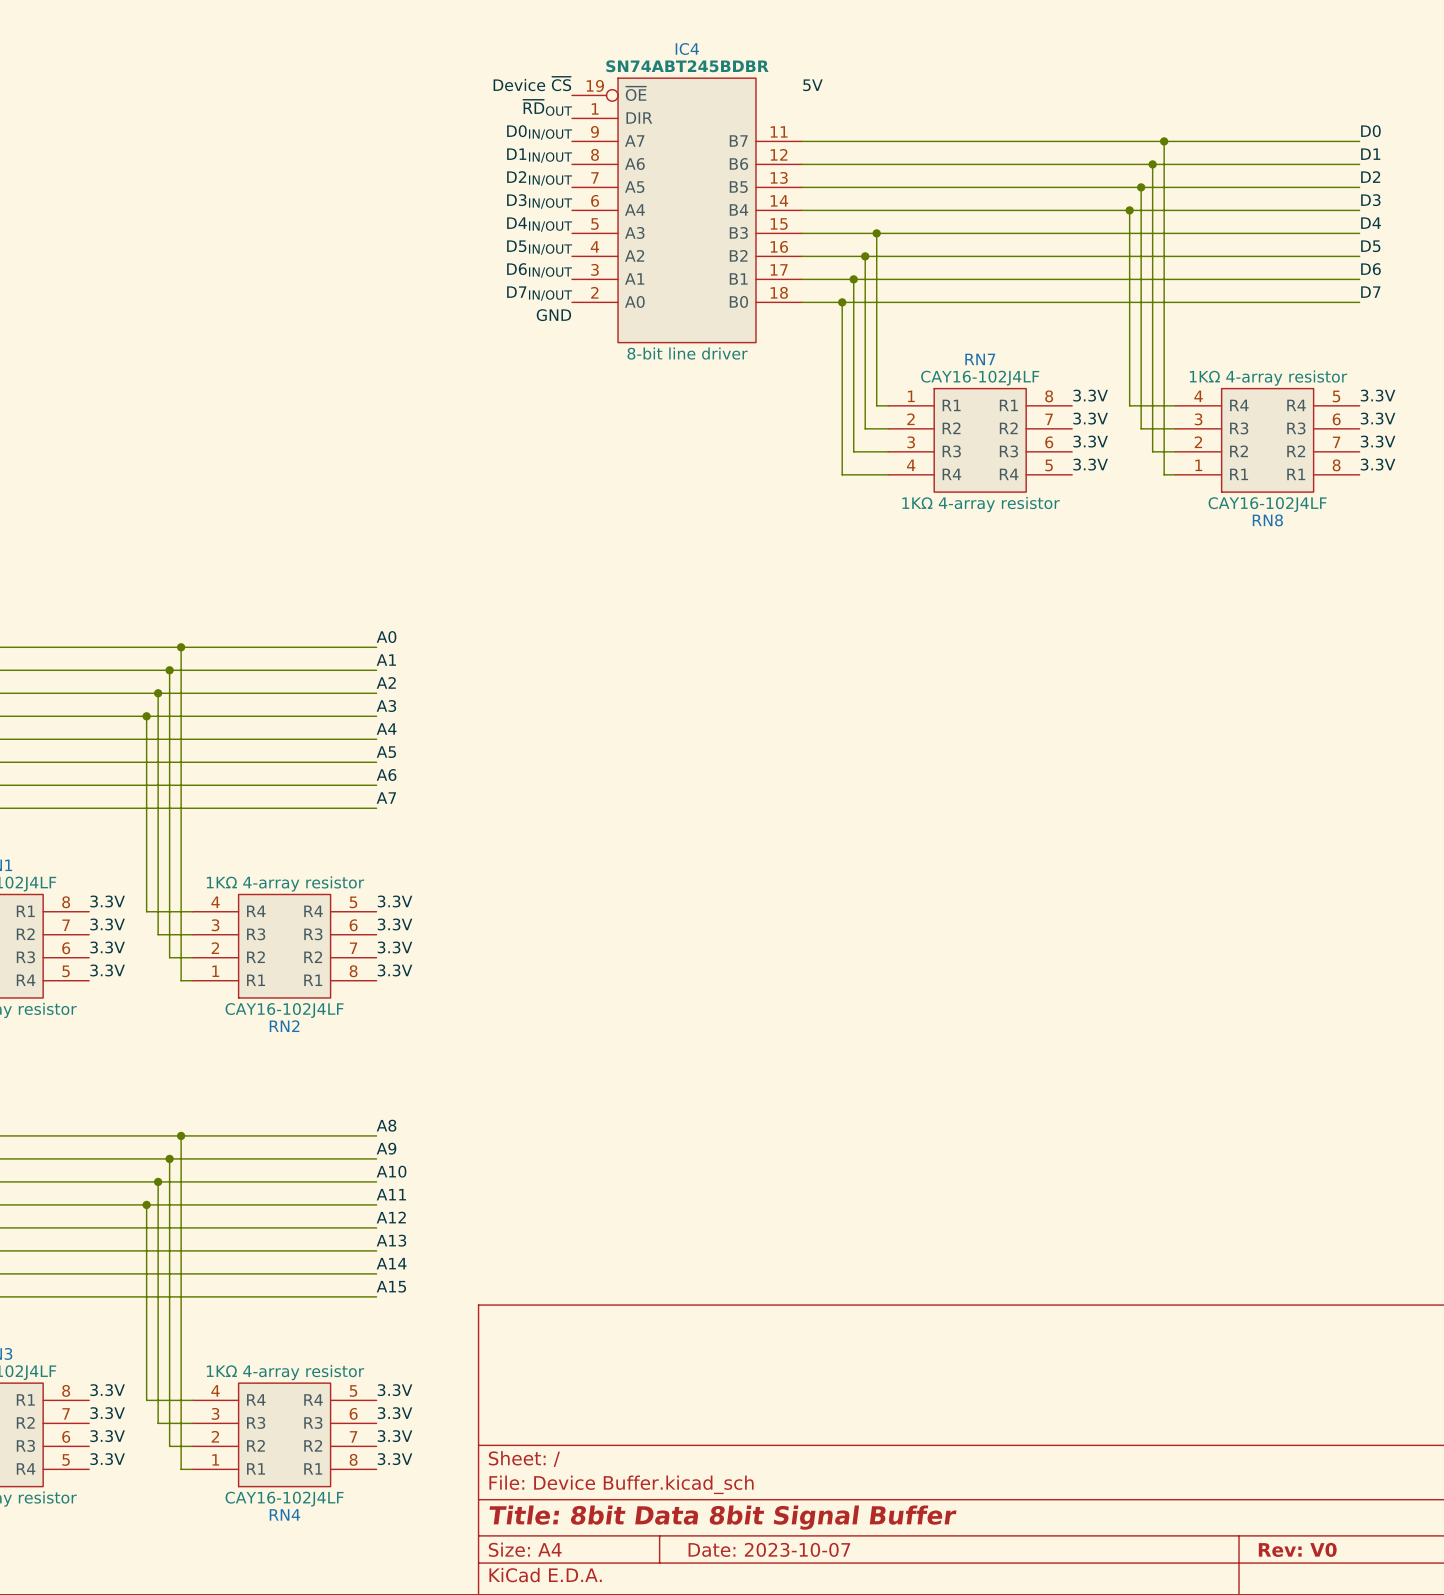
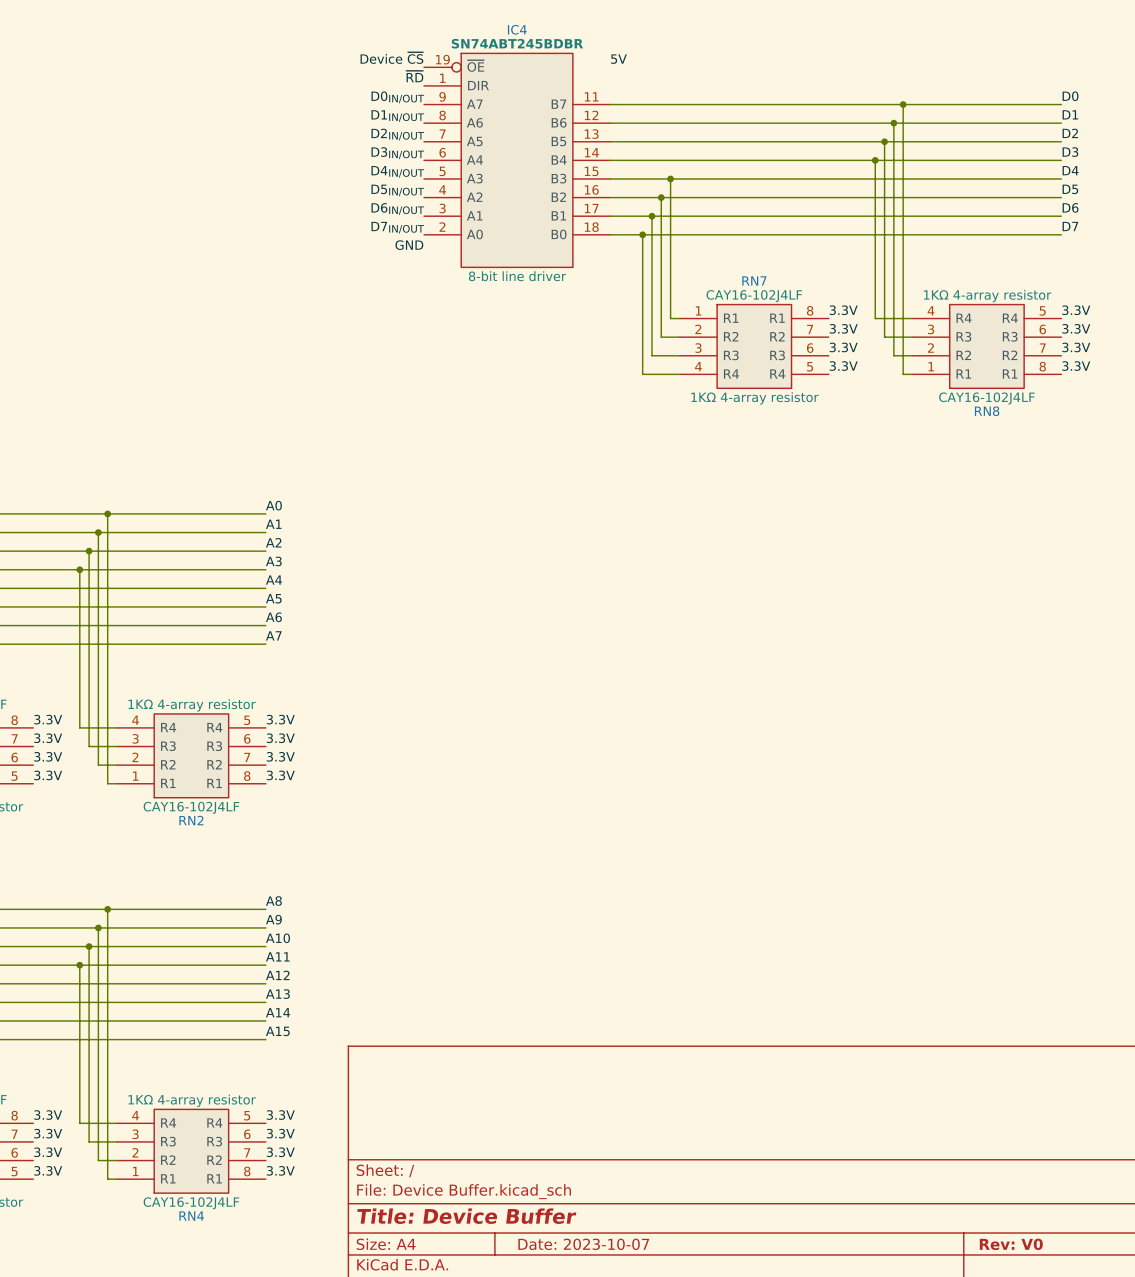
label: ~{RD}OUT (547, 107) -> ~{RD} (414, 76)
title block: Title: 8bit Data 8bit Signal Buffer (722, 1517) -> Title: Device Buffer (466, 1216)

